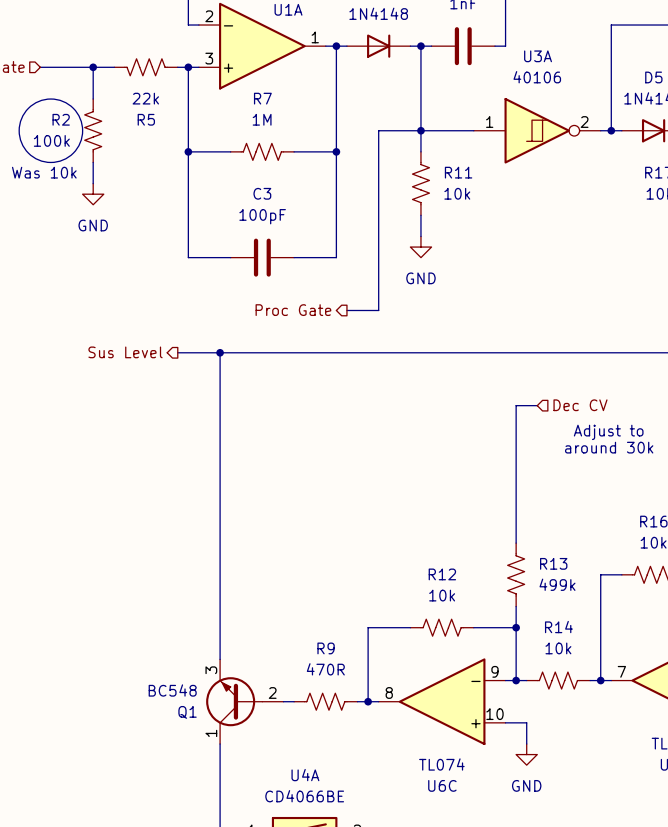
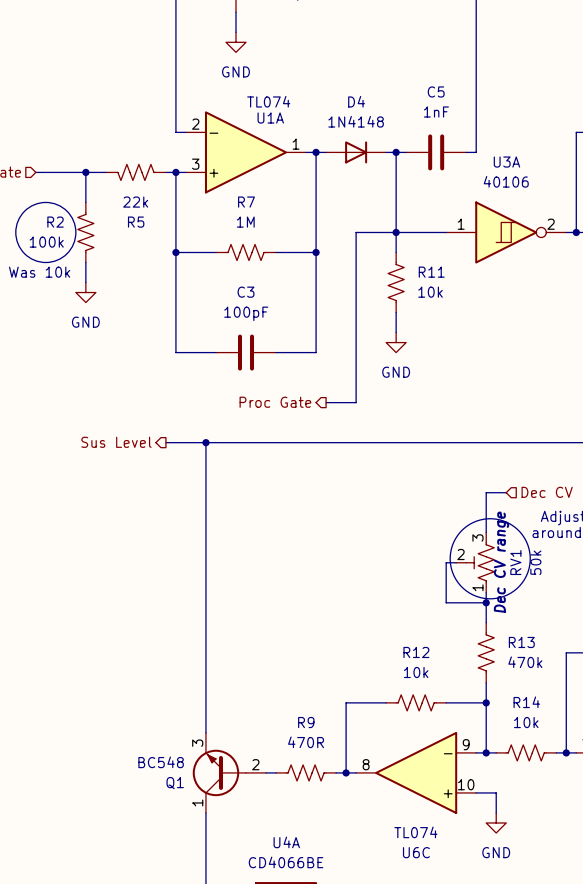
drawing: none -> [450, 518, 531, 599]
wire: none -> (456, 562) (446, 562) (446, 602) (486, 602)
RV1: none -> 50k (475, 562)
junction: none -> (486, 602)
R13 value: 499k (557, 584) -> 470k (525, 662)

